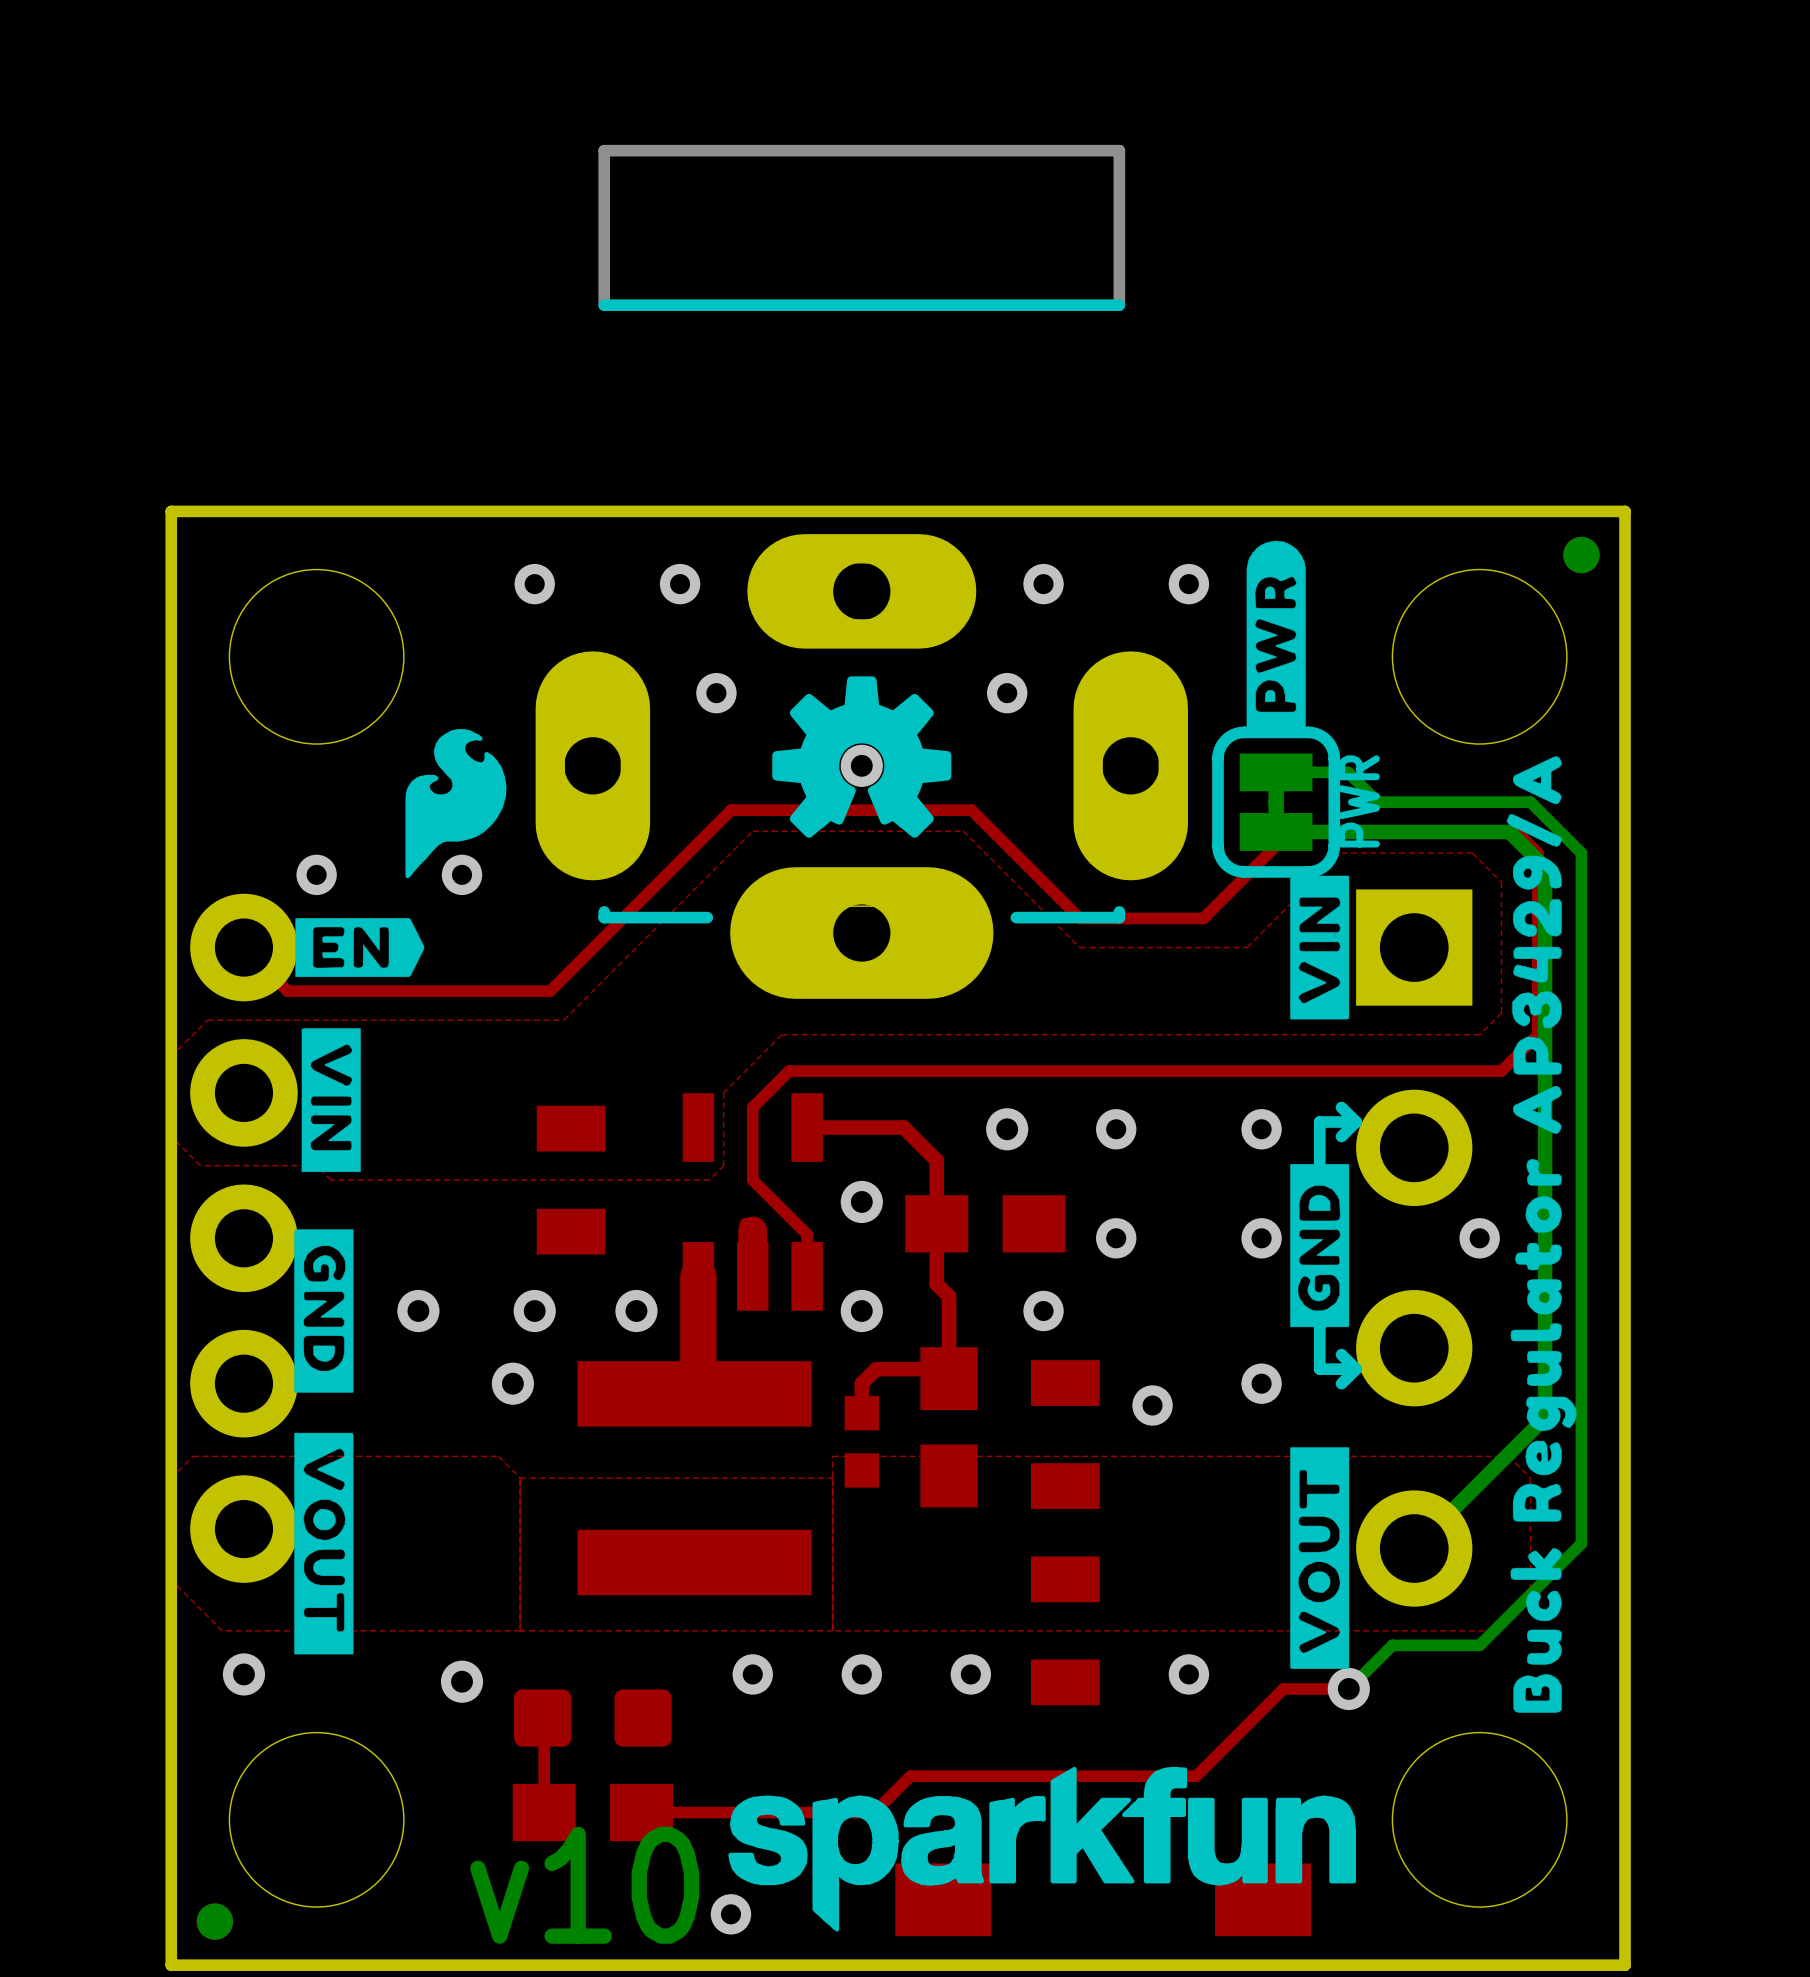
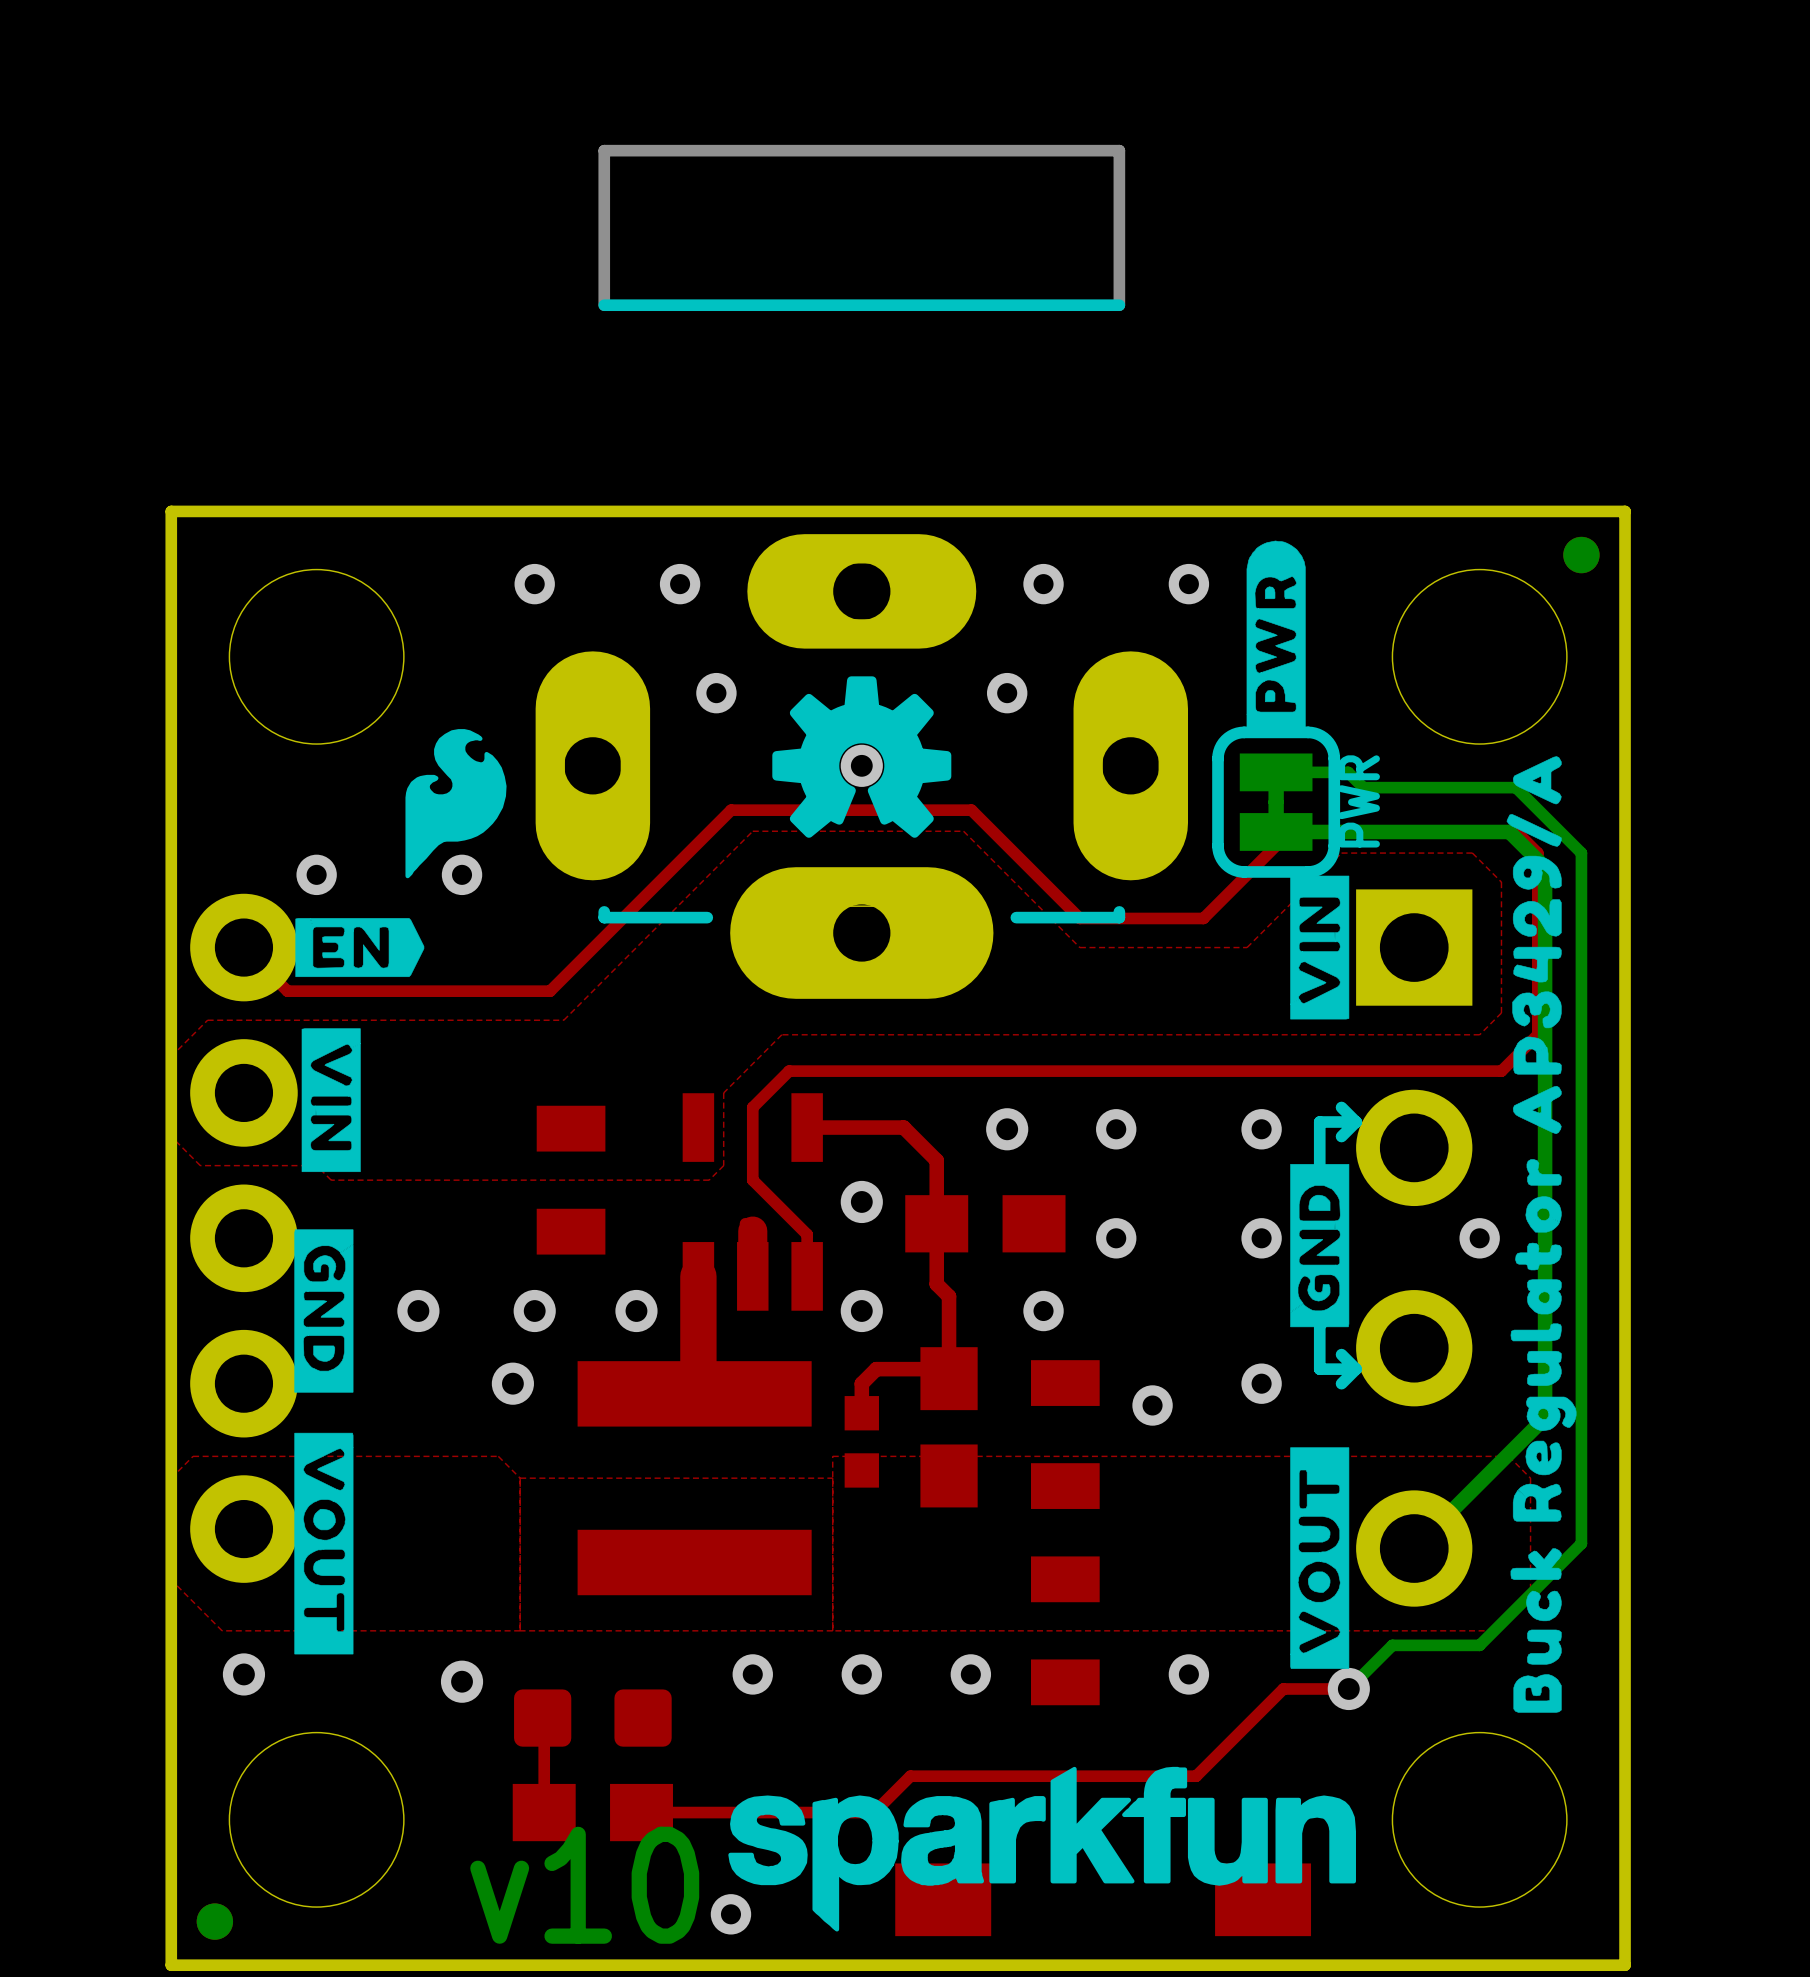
bottom track: (1363, 787) (1377, 802) (1530, 802) -> (1363, 787) (1516, 787) (1530, 802)

